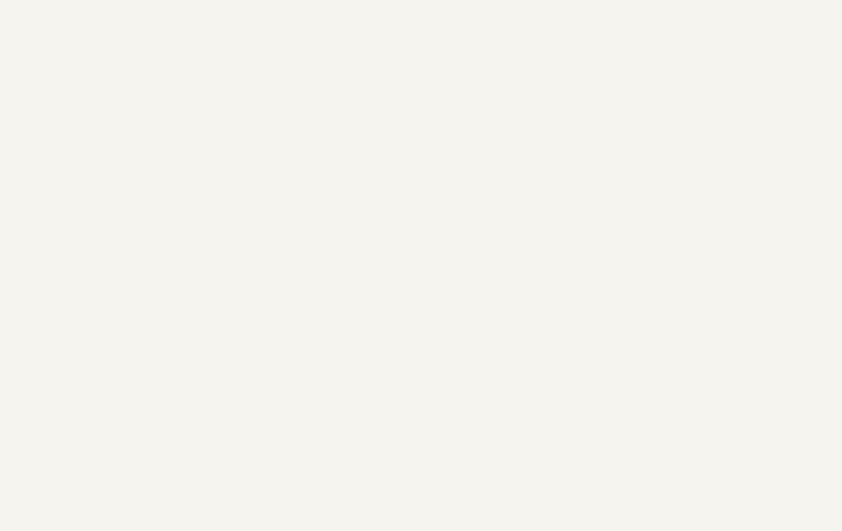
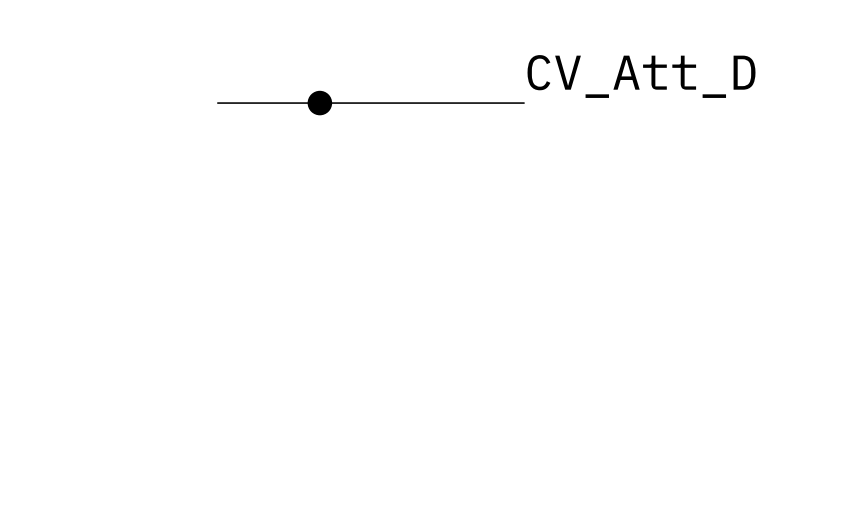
label: none -> CV_Att_D (641, 76)
wire: none -> (217, 103) (524, 103)
junction: none -> (319, 103)

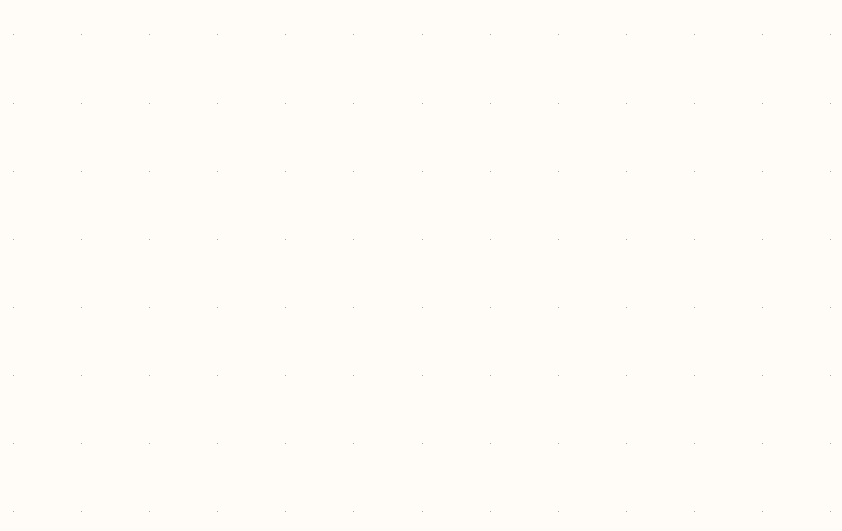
label: CV_Att_D (641, 76) -> none
wire: (217, 103) (524, 103) -> none
junction: (319, 103) -> none

